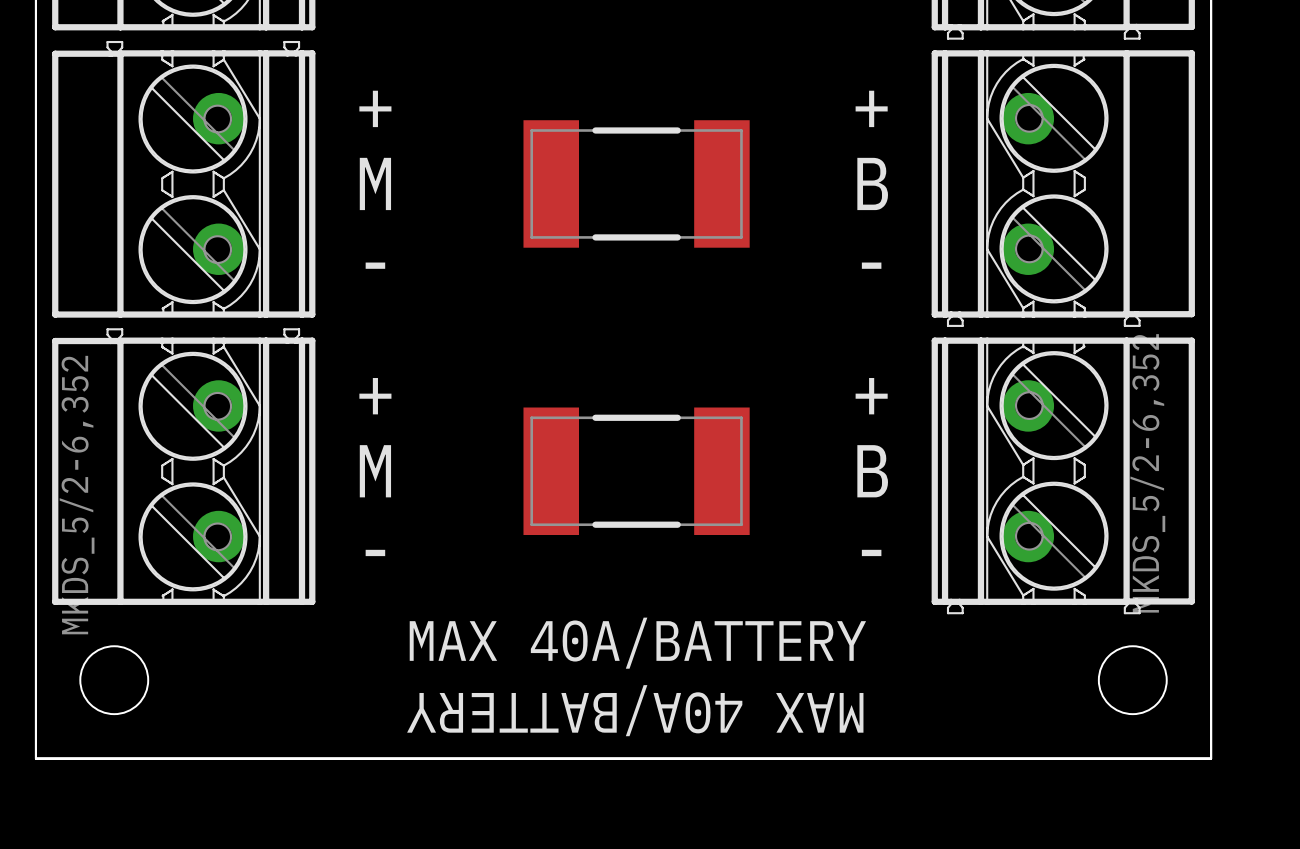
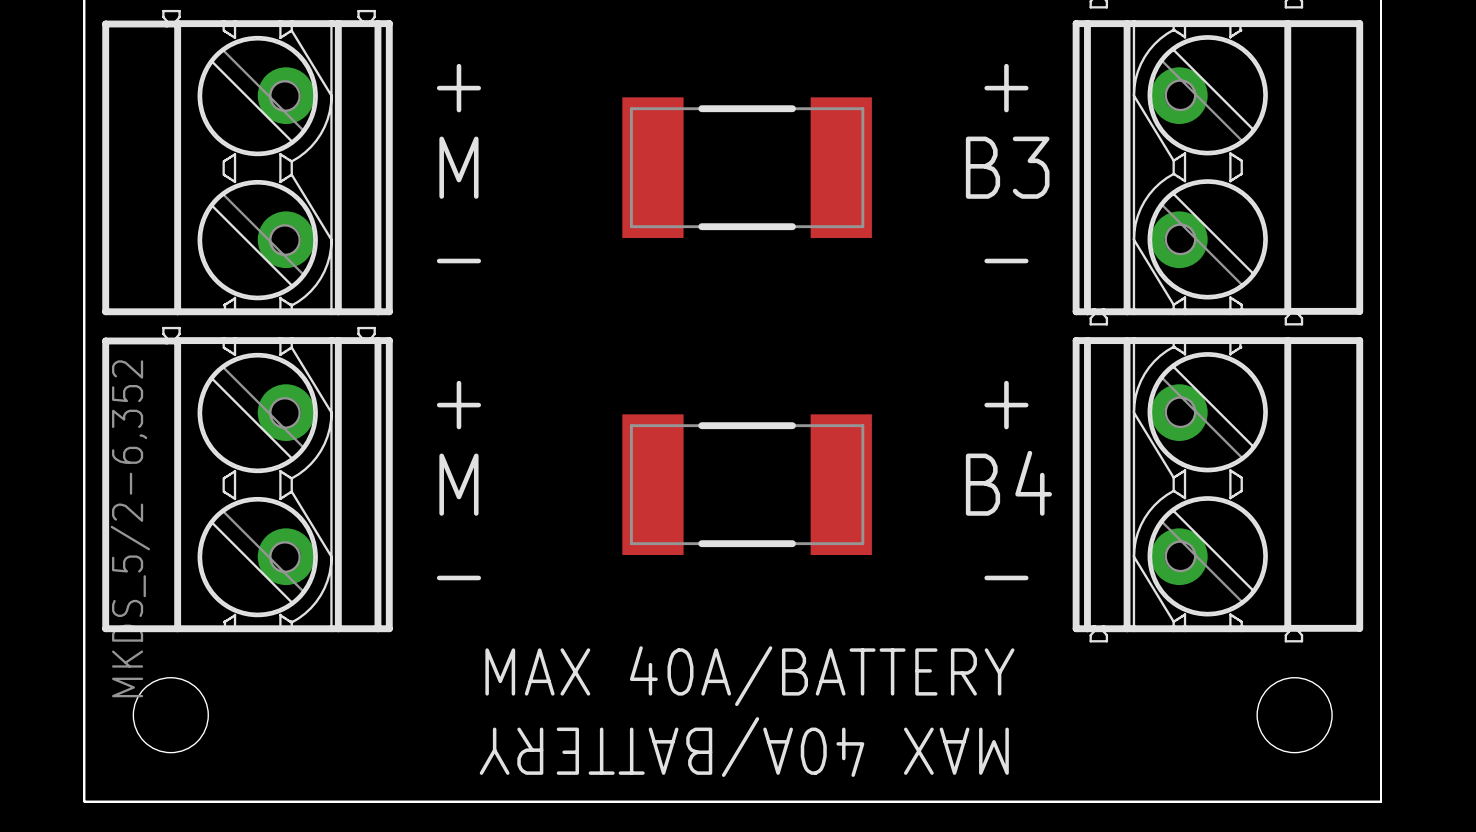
text: B (872, 183) -> B3 (1007, 167)
text: B (872, 471) -> B4 (1008, 483)
part value: MKDS_5/2-6,352 (1147, 473) -> none

